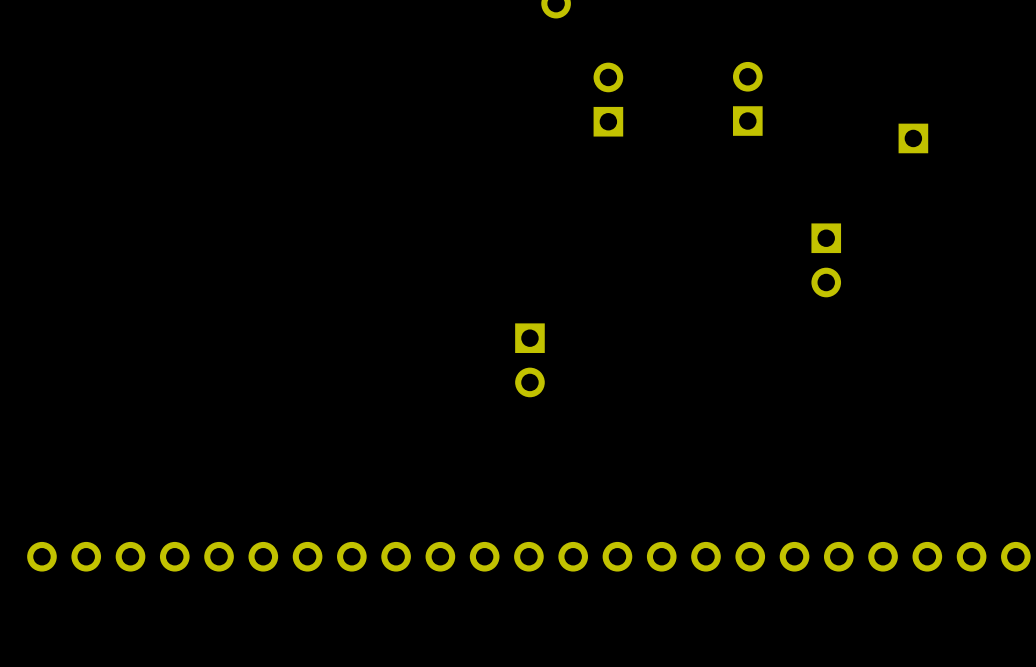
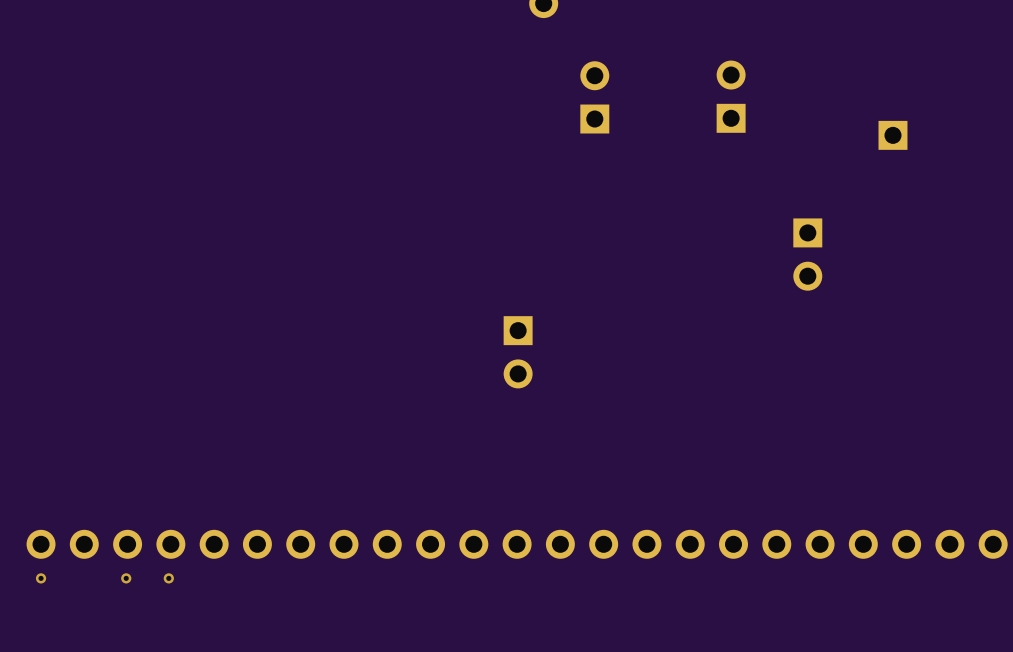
via: none -> (41, 578)
via: none -> (126, 578)
via: none -> (168, 578)

